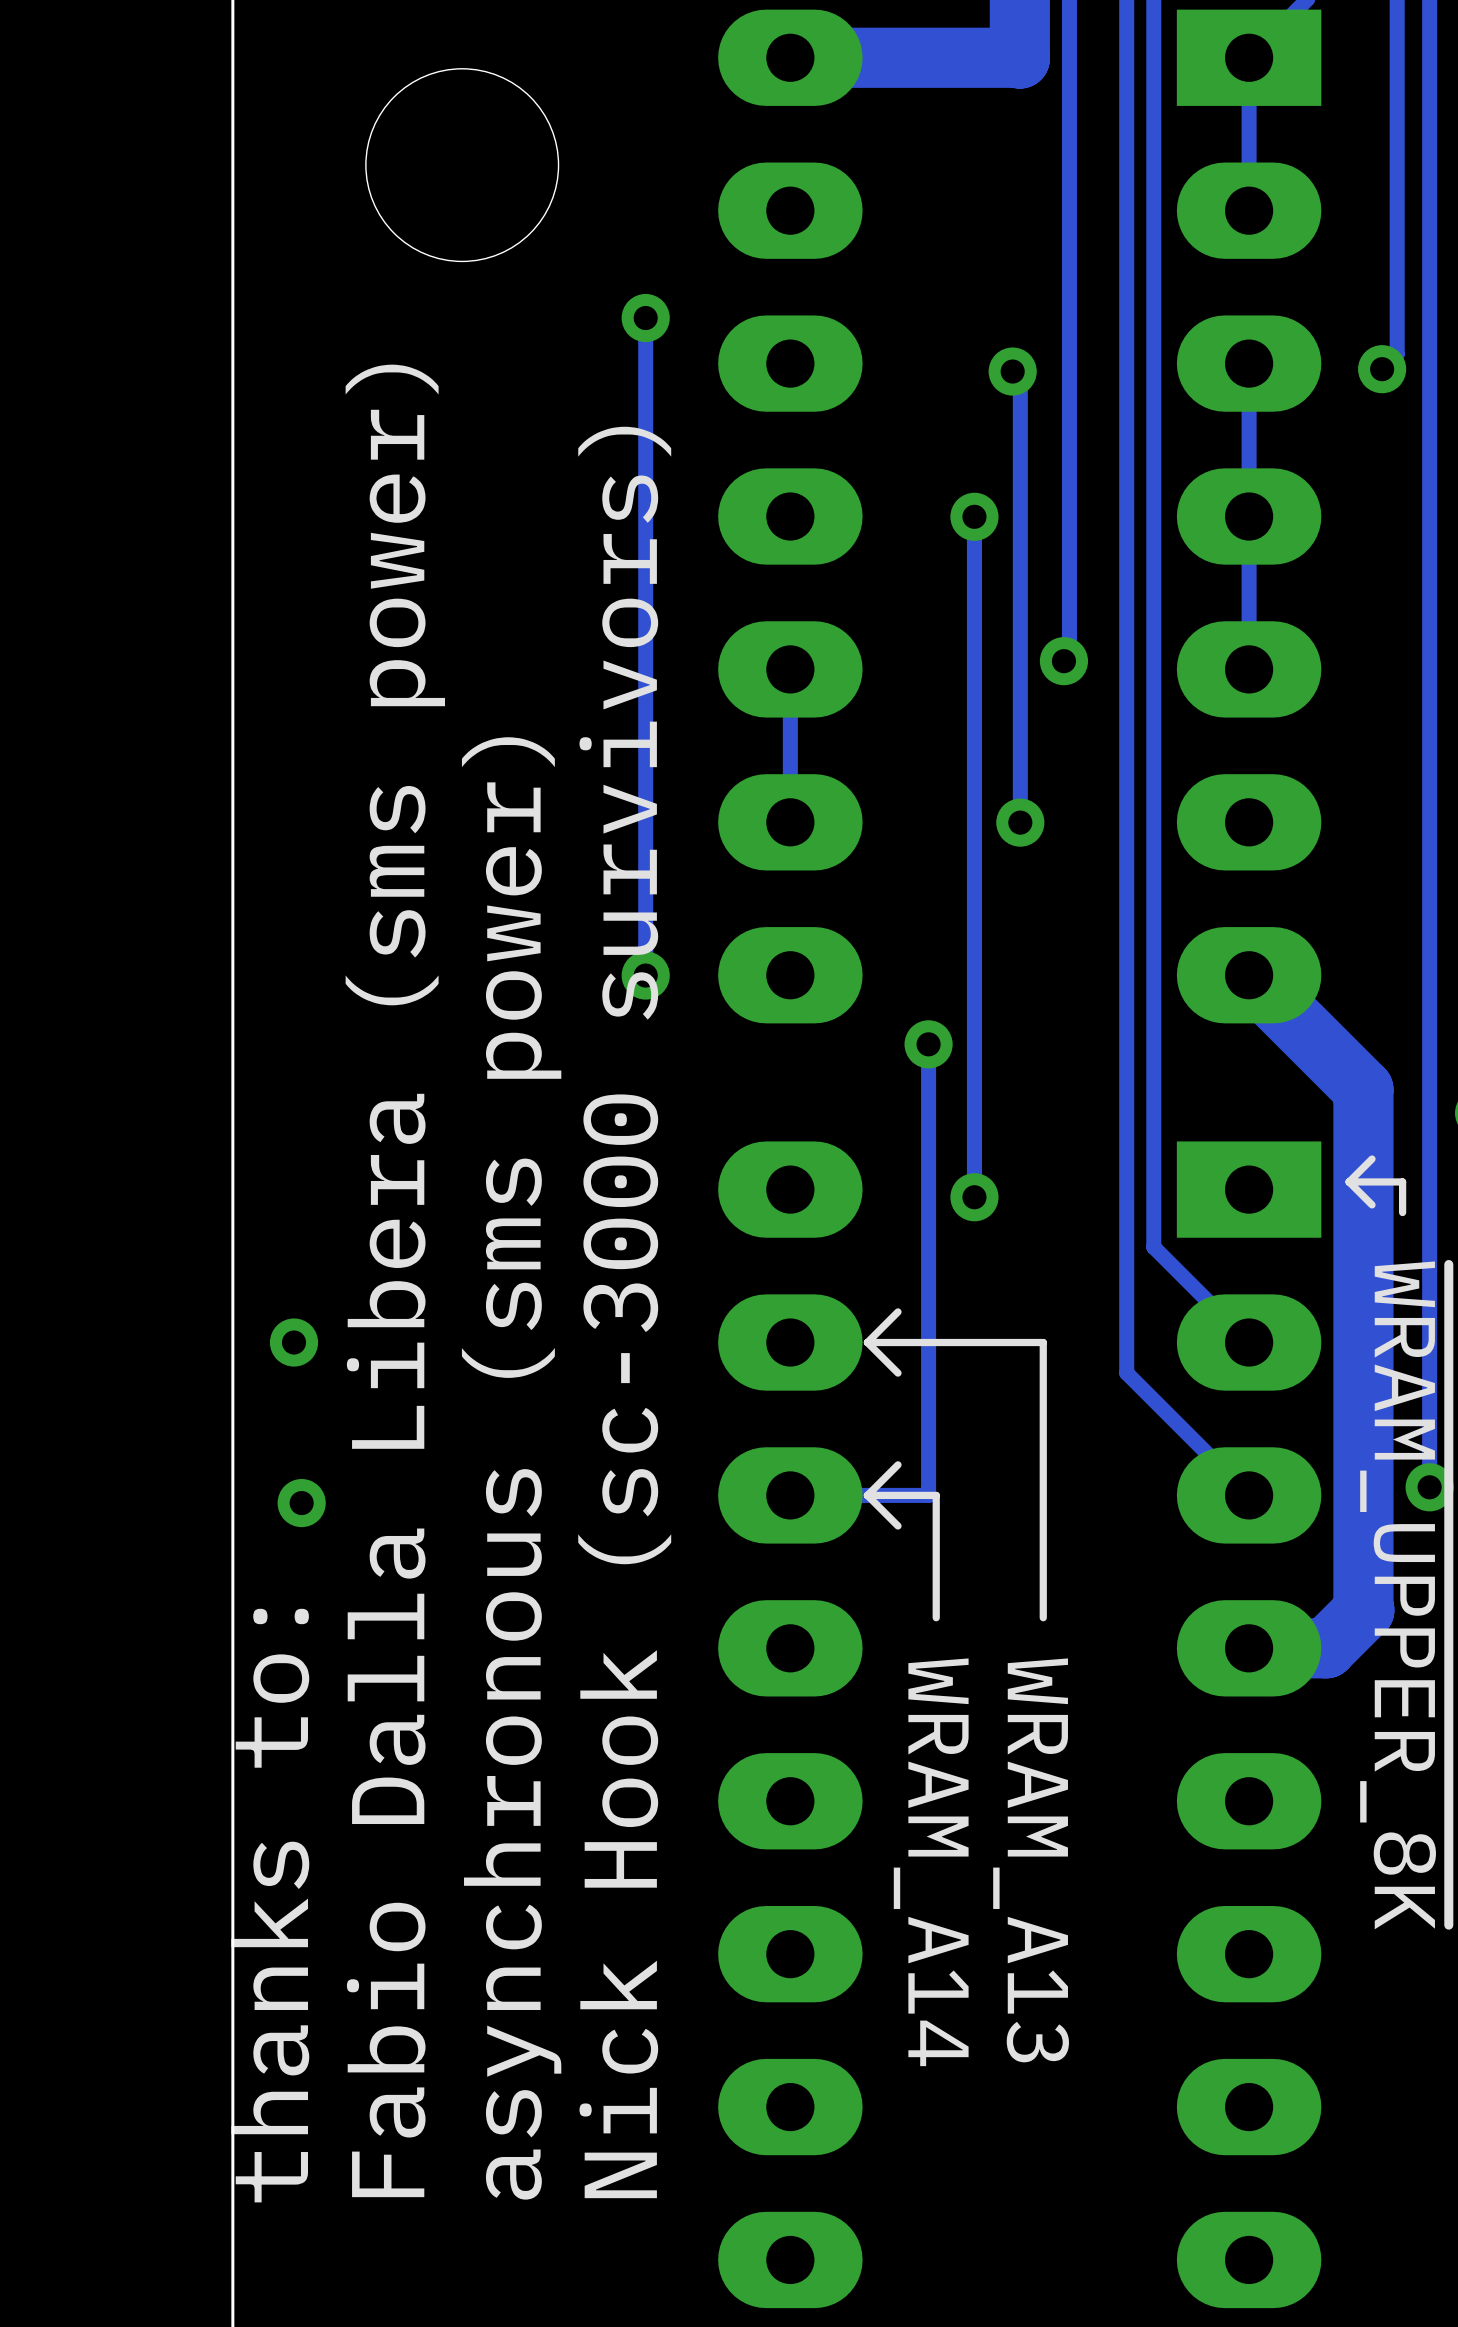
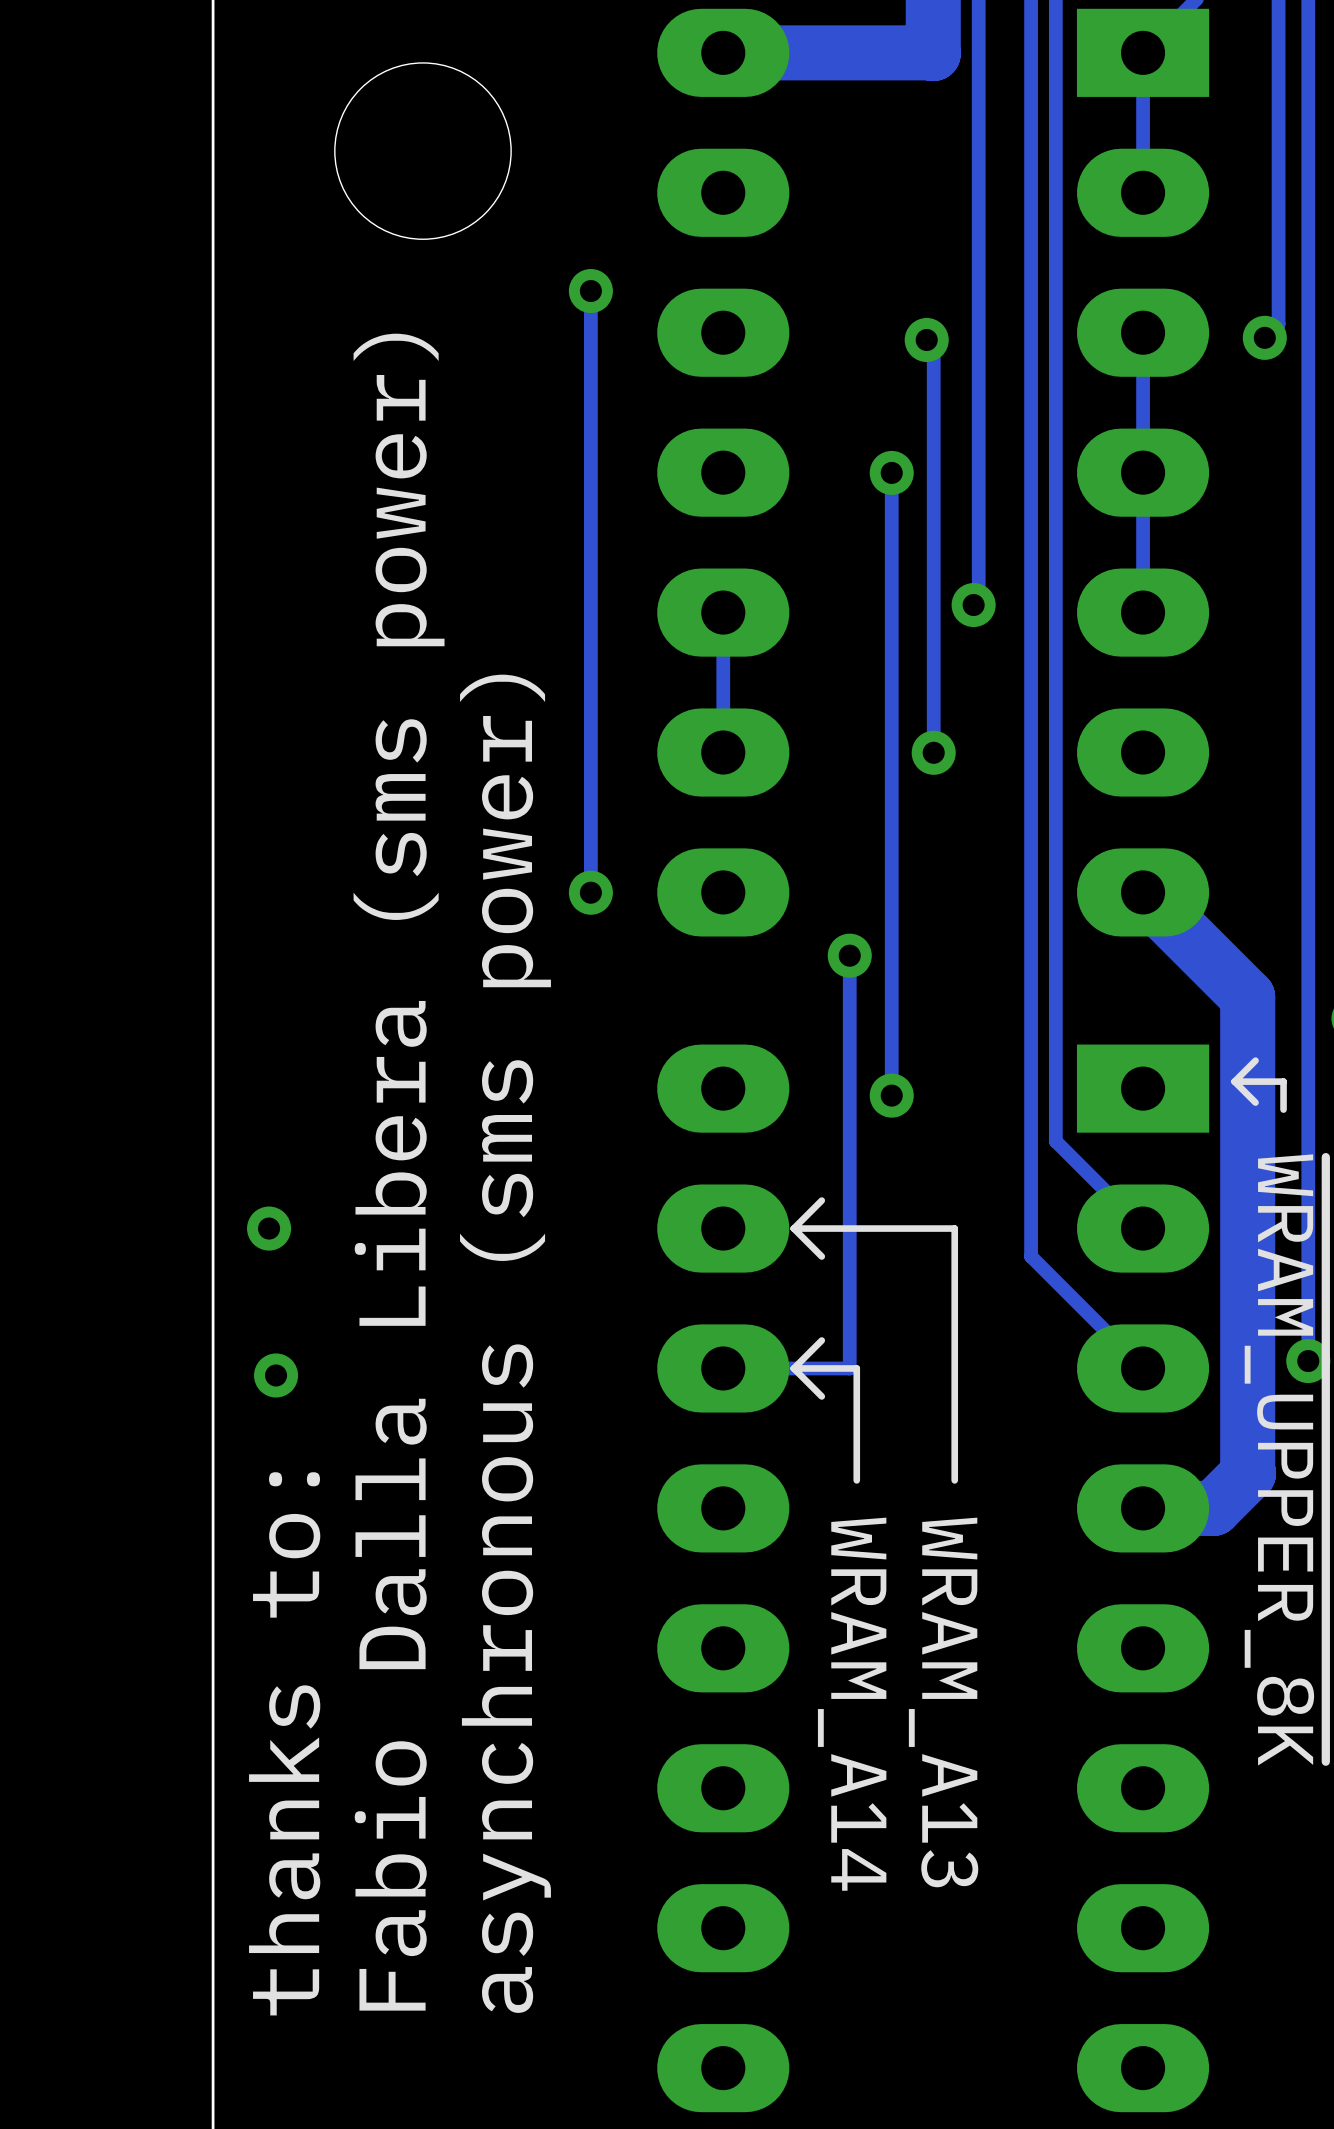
text position: Fabio Dalla Libera (sms power) (395, 1280) -> Fabio Dalla Libera (sms power) (399, 1172)
text: Nick Hook (sc-3000 survivors) (624, 1312) -> none
text position: asynchronous (sms power) (511, 1468) -> asynchronous (sms power) (505, 1343)
text position: thanks to: (270, 1905) -> thanks to: (284, 1743)

